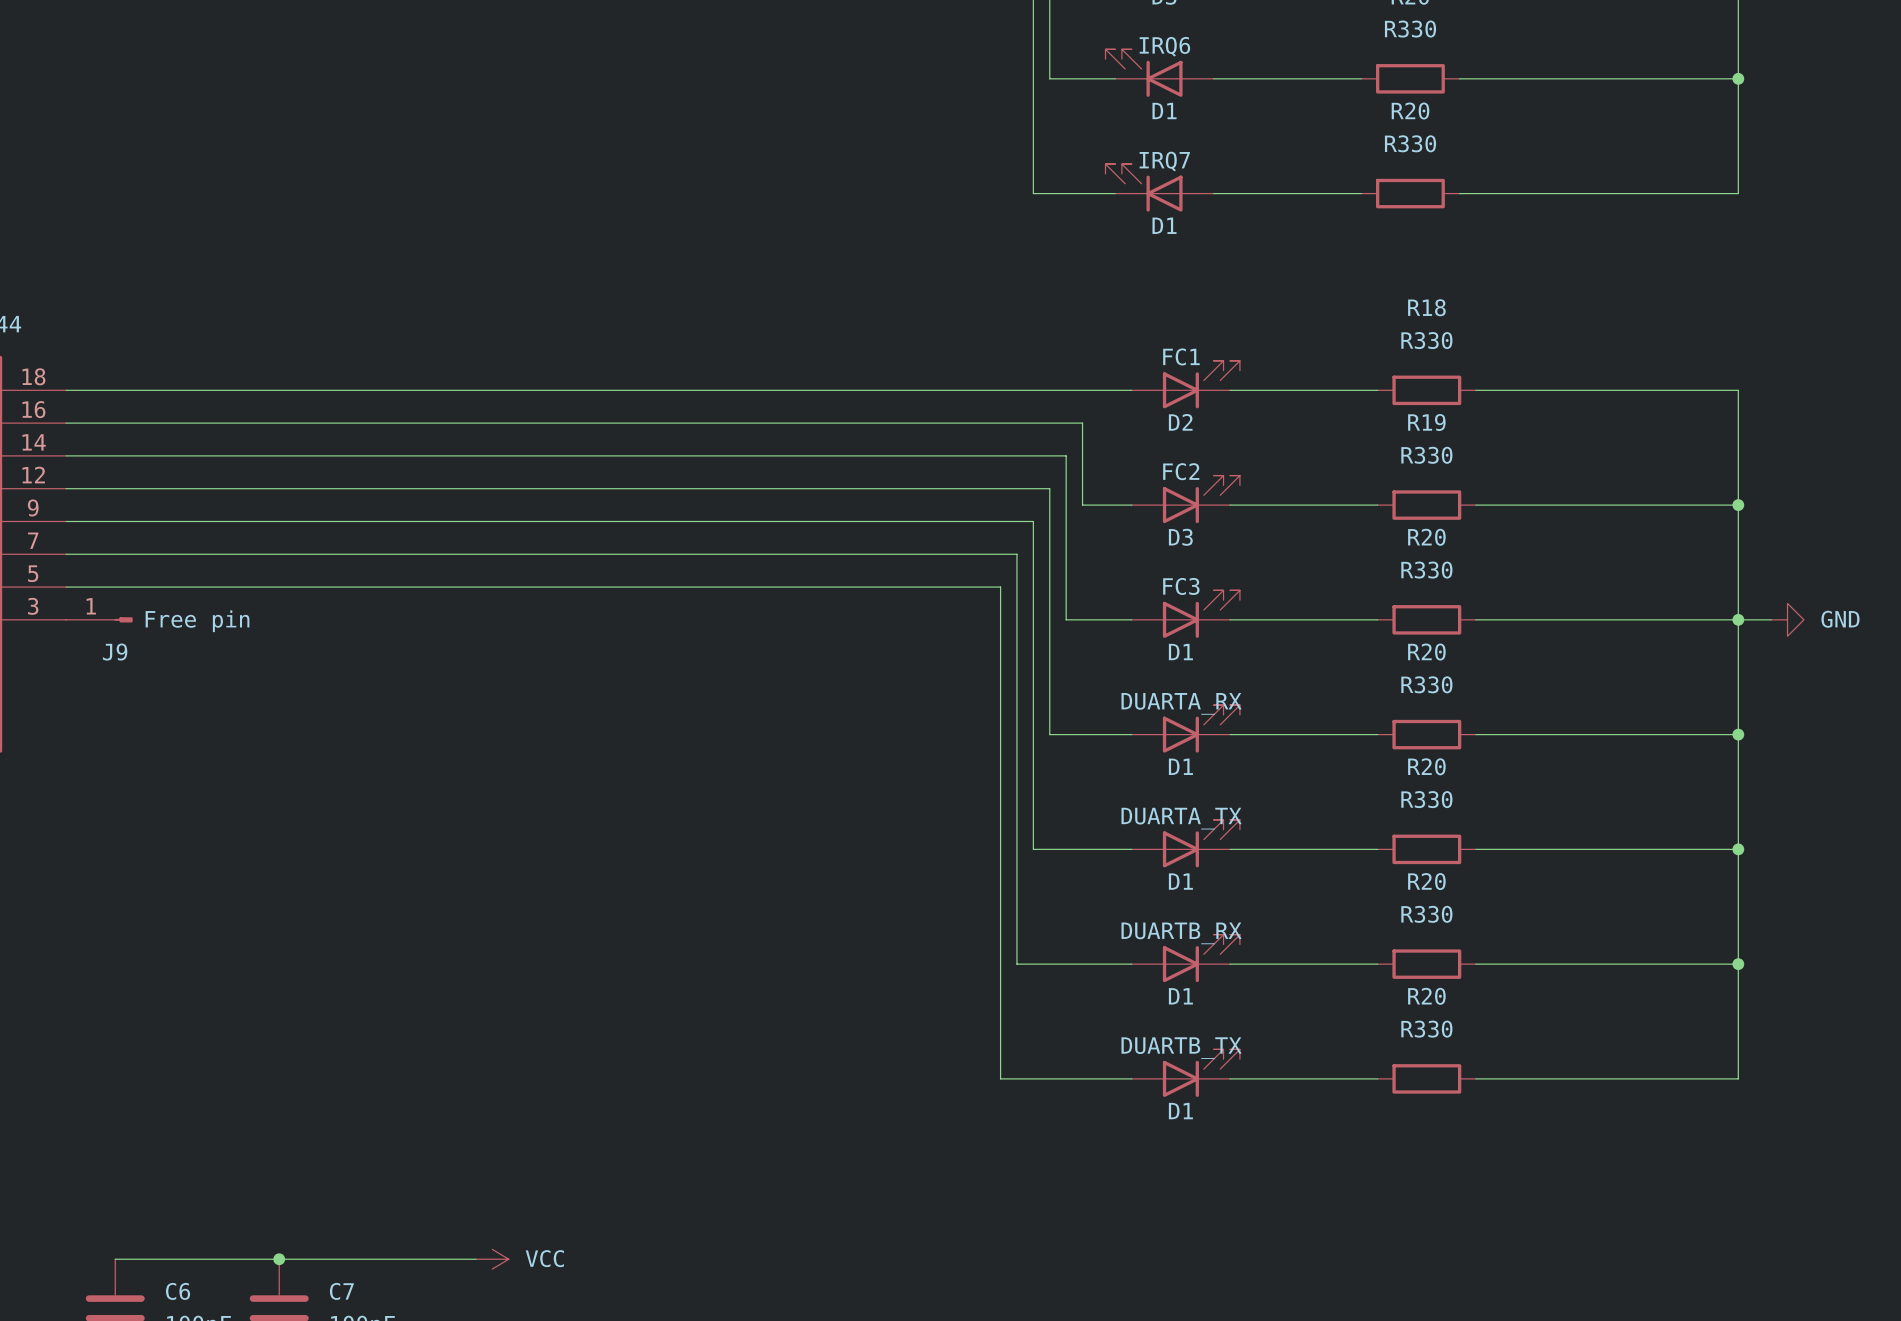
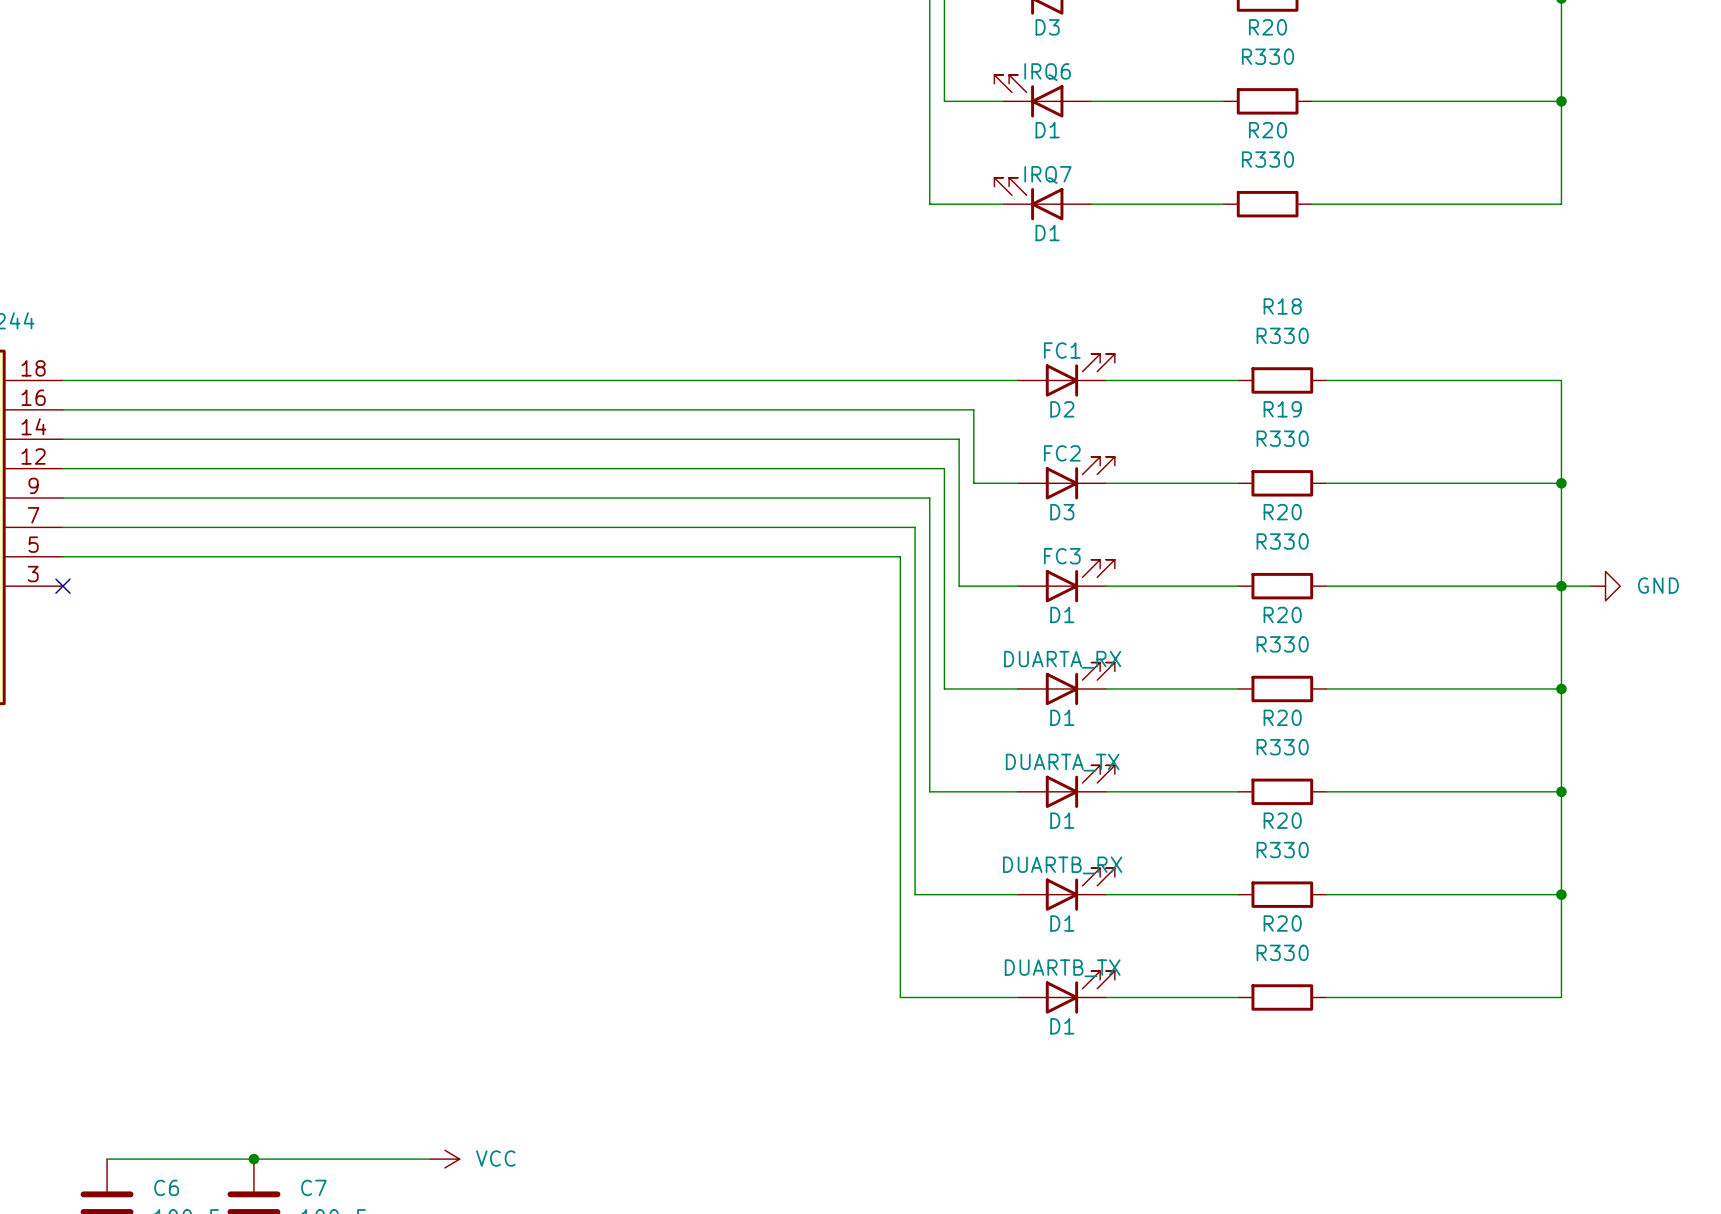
no-connect mark: none -> (62, 586)
J9: Free pin (99, 619) -> none

